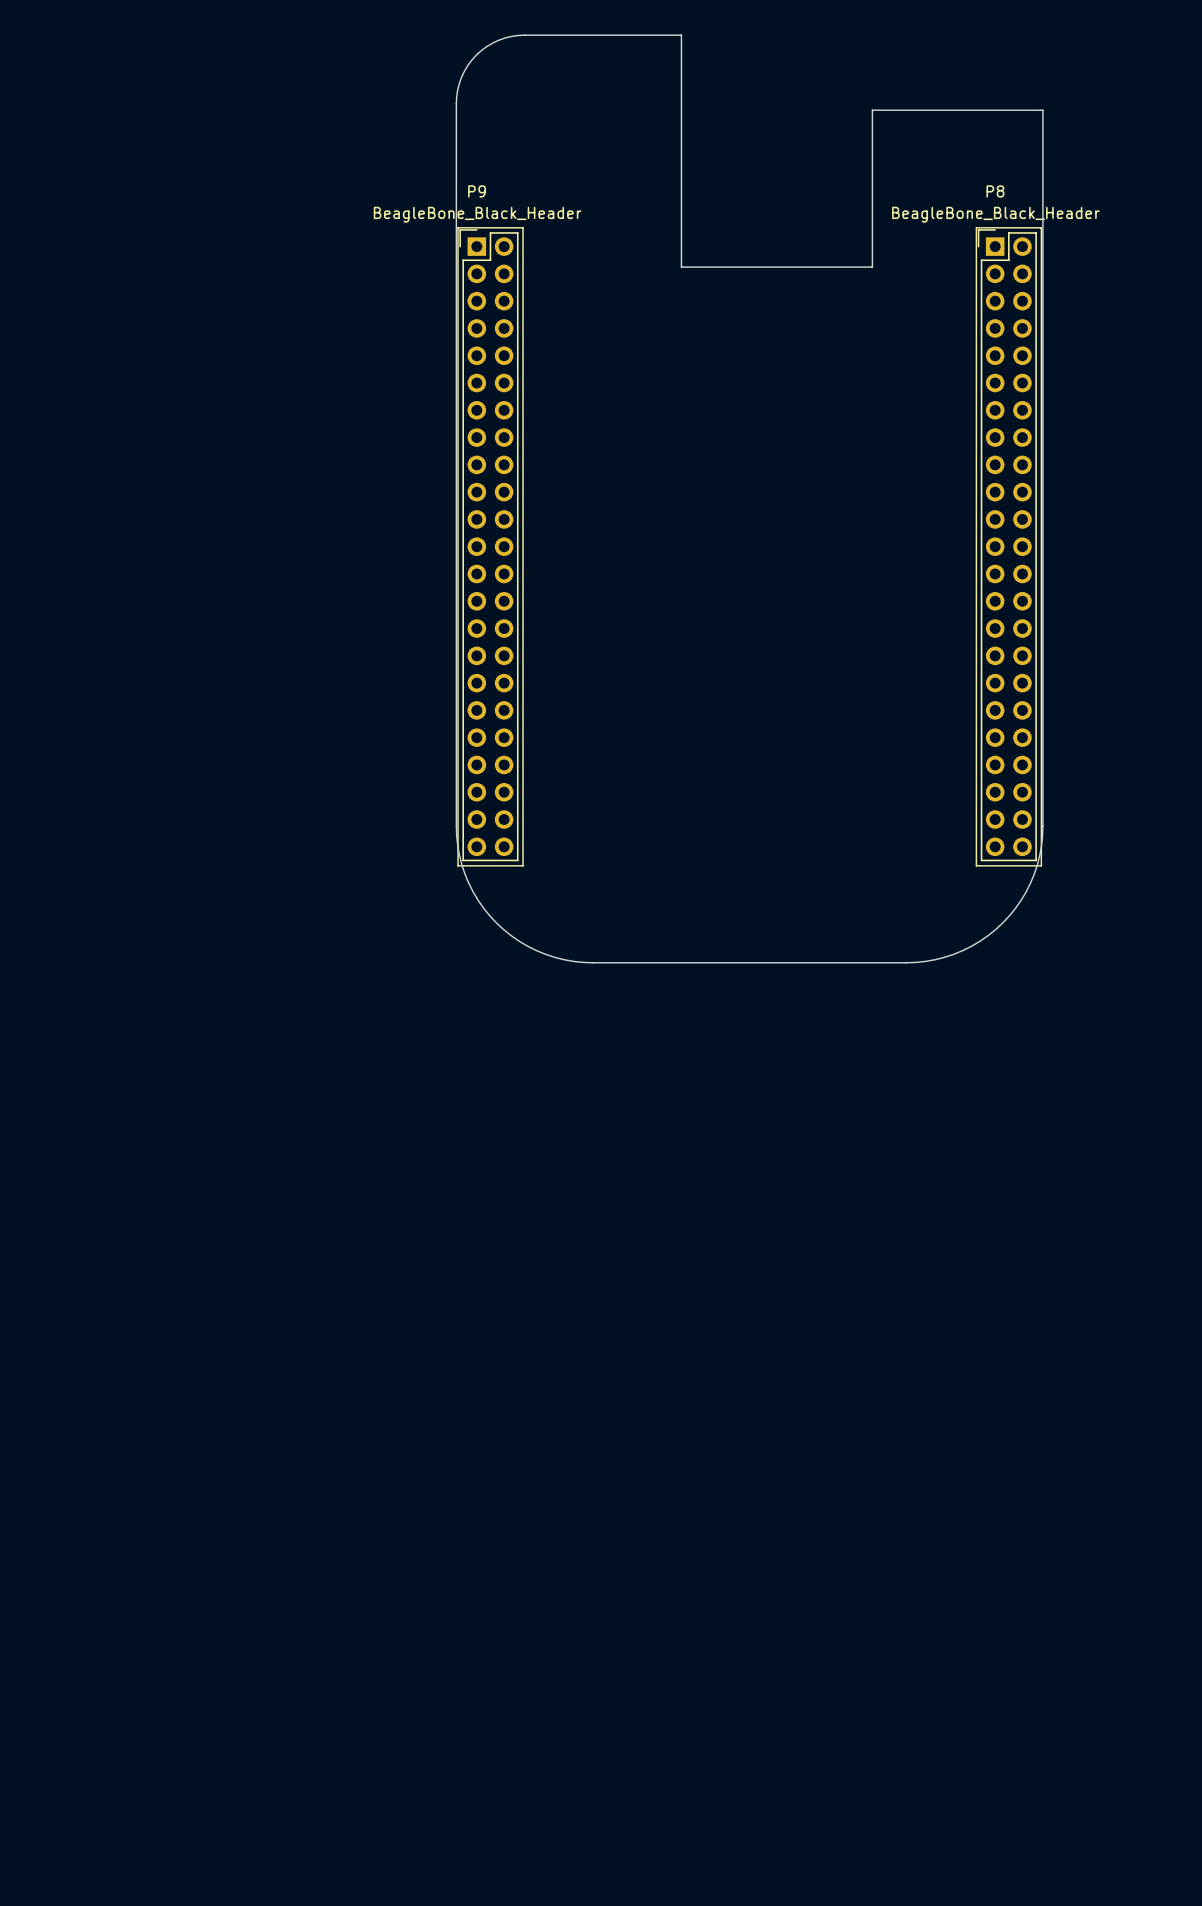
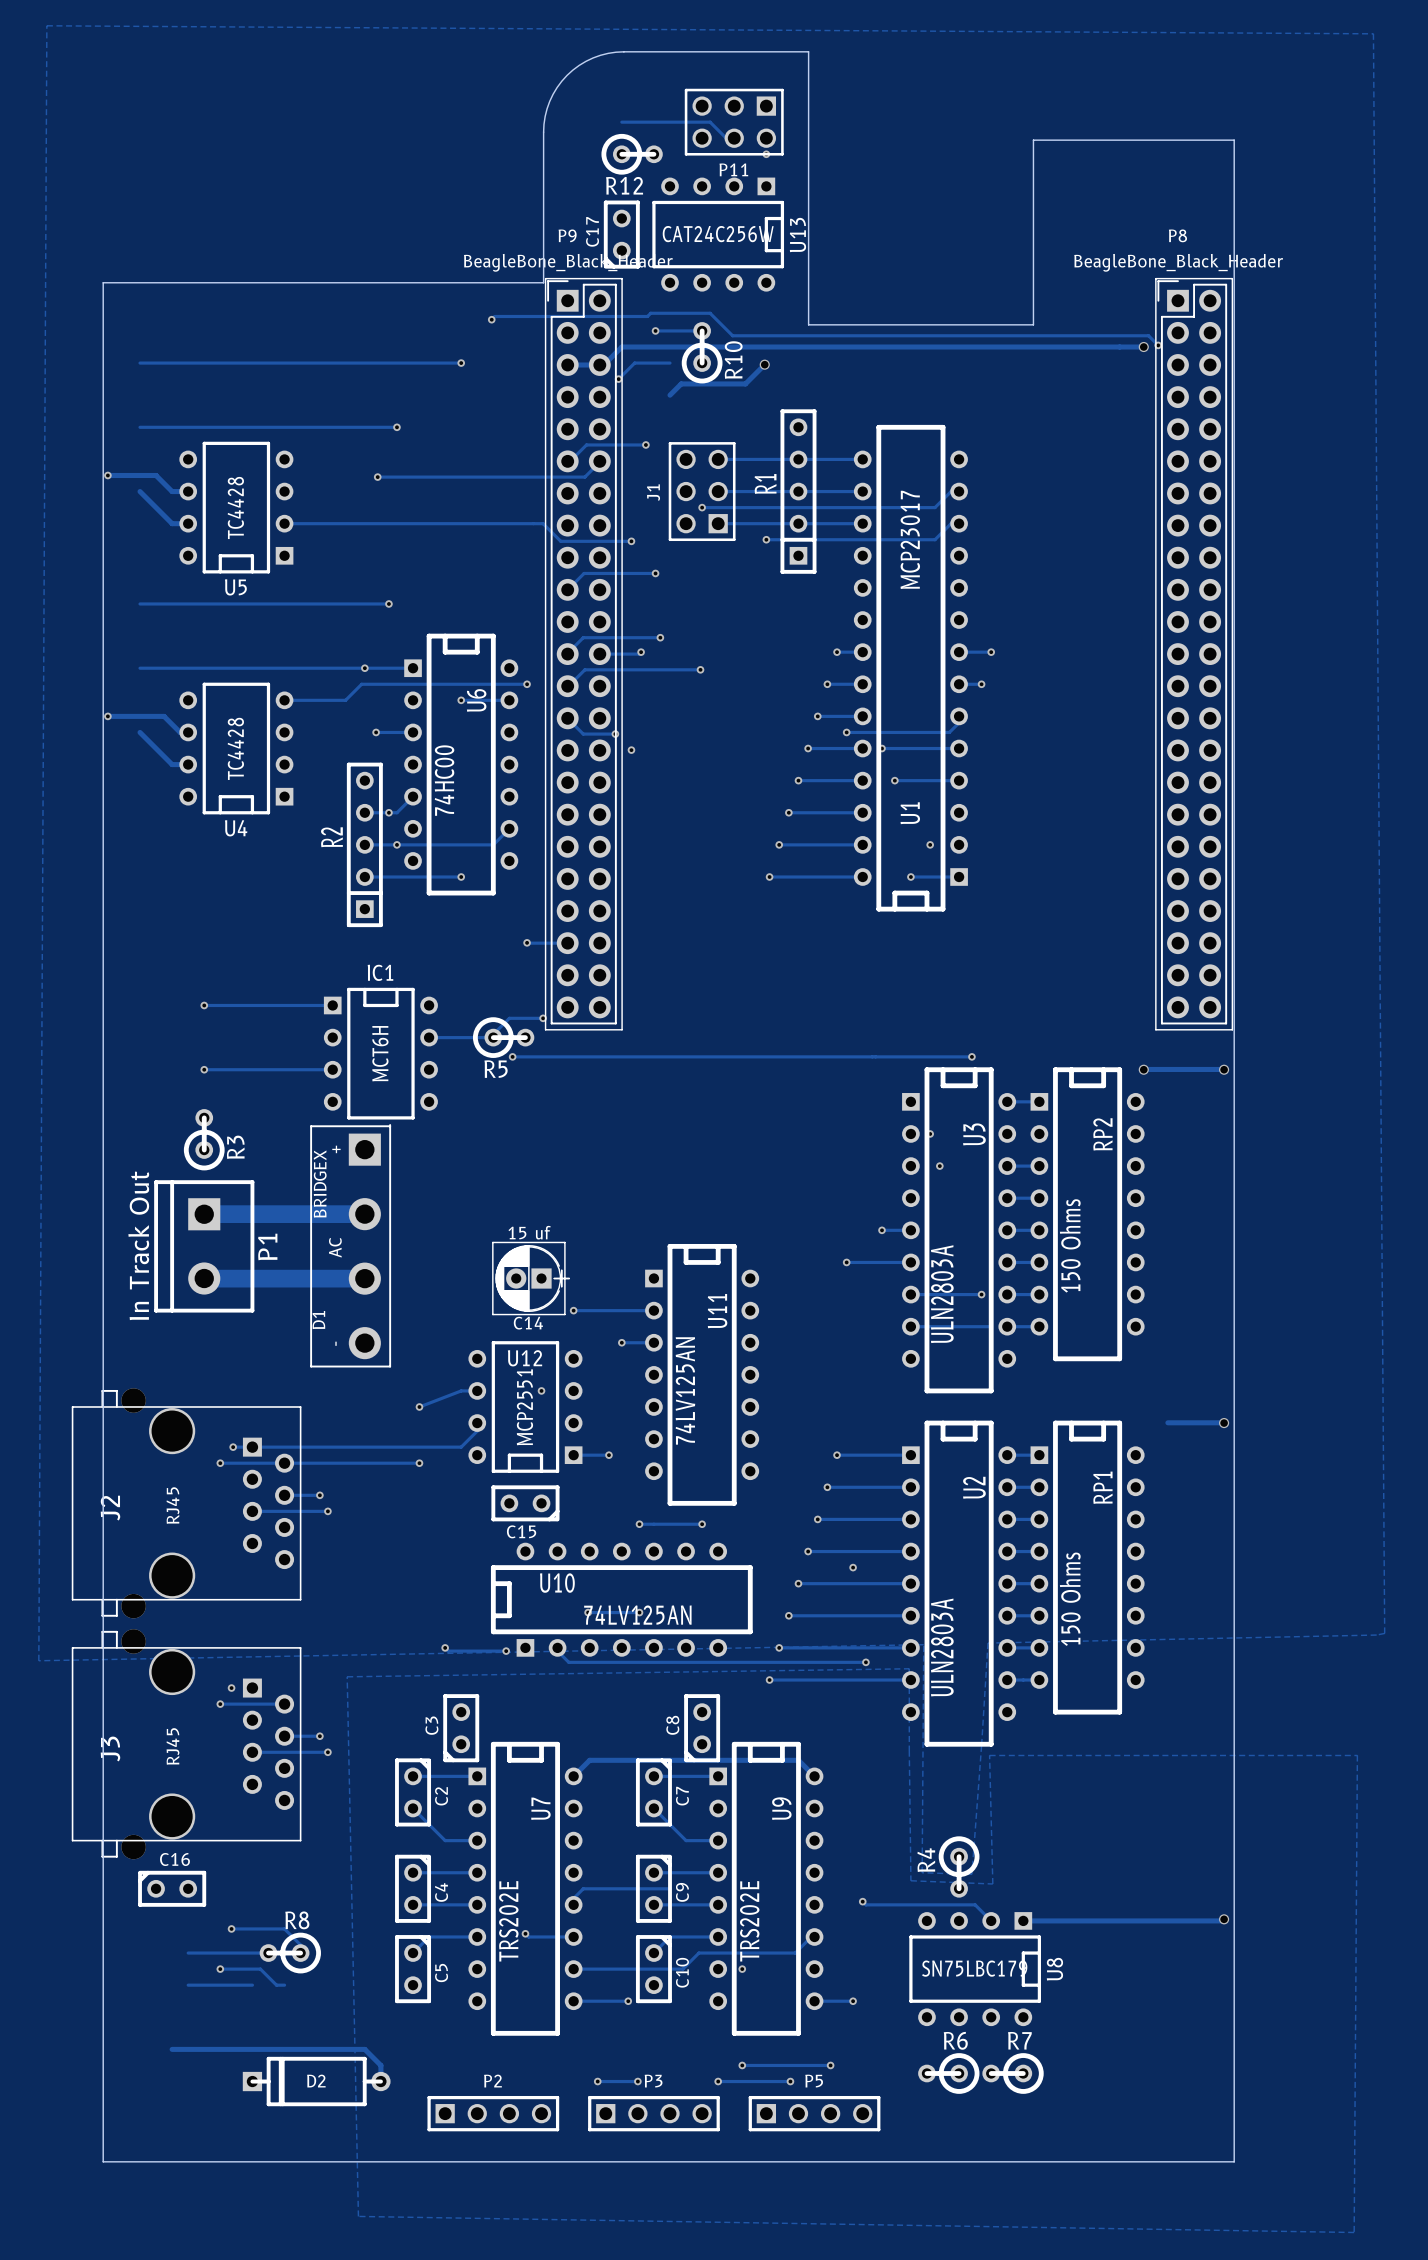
zone outline: none -> (46, 25) (38, 1660) (923, 1644) (922, 1872) (971, 1874) (988, 1643) (1384, 1633) (1373, 33) (46, 25)
track: none -> (621, 122) (710, 122) (726, 138) (734, 138)
P11: none -> (734, 122)
R12: none -> (632, 154)
via: none -> (766, 154)
C17: none -> (621, 234)
U13: none -> CAT24C256W (718, 234)
board edge: (456, 231) (456, 836) (459, 855) (468, 883) (478, 900) (496, 922) (519, 941) (536, 950) (554, 957) (583, 962) (925, 961) (954, 954) (971, 946) (995, 929) (1009, 915) (1026, 891) (1034, 874) (1041, 845) (1042, 826) -> (543, 282) (103, 282) (103, 2161) (1234, 2161) (1234, 983)
track: none -> (491, 319) (494, 316) (647, 316) (650, 313) (710, 313) (732, 335) (1148, 335) (1158, 345)
via: none -> (491, 319)
track: none -> (655, 330) (702, 330)
via: none -> (655, 330)
via: none -> (1158, 345)
track: none -> (1143, 347) (621, 347) (603, 364) (567, 364)
via: none -> (1143, 347)
R10: none -> (702, 352)
track: none -> (140, 363) (461, 363)
via: none -> (461, 363)
track: none -> (670, 363) (634, 363) (618, 379)
track: none -> (764, 364) (745, 383) (681, 383) (670, 395)
via: none -> (764, 364)
via: none -> (618, 379)
track: none -> (140, 427) (396, 427)
via: none -> (396, 427)
track: none -> (645, 444) (586, 444) (570, 461) (567, 461)
via: none -> (645, 444)
track: none -> (718, 459) (862, 459)
track: none -> (599, 461) (584, 477) (377, 477)
track: none -> (107, 475) (156, 475) (172, 491) (188, 491)
via: none -> (107, 475)
via: none -> (377, 477)
track: none -> (140, 491) (172, 523) (188, 523)
J1: none -> (702, 491)
track: none -> (718, 491) (862, 491)
R1: none -> (798, 491)
track: none -> (959, 491) (951, 491) (935, 507) (702, 507)
U5: none -> TC4428 (236, 507)
via: none -> (702, 507)
track: none -> (284, 523) (543, 523) (560, 541) (631, 541)
track: none -> (718, 523) (862, 523)
track: none -> (959, 523) (951, 523) (935, 539) (766, 539)
via: none -> (766, 539)
via: none -> (631, 541)
track: none -> (655, 573) (584, 573) (567, 589)
via: none -> (655, 573)
track: none -> (140, 603) (388, 603)
via: none -> (388, 603)
track: none -> (660, 637) (583, 637) (567, 654)
via: none -> (660, 637)
track: none -> (641, 652) (639, 654) (599, 654)
via: none -> (641, 652)
track: none -> (837, 652) (862, 652)
via: none -> (837, 652)
track: none -> (959, 652) (991, 652)
via: none -> (991, 652)
track: none -> (140, 668) (413, 668)
via: none -> (364, 668)
U1: none -> MCP23017 (910, 668)
track: none -> (700, 669) (584, 669) (567, 686)
via: none -> (700, 669)
track: none -> (527, 684) (361, 684) (345, 700) (284, 700)
via: none -> (527, 684)
track: none -> (827, 684) (862, 684)
via: none -> (827, 684)
track: none -> (959, 684) (981, 684)
via: none -> (981, 684)
track: none -> (461, 700) (509, 700)
via: none -> (461, 700)
track: none -> (107, 716) (164, 716) (180, 732) (188, 732)
via: none -> (107, 716)
track: none -> (817, 716) (862, 716)
via: none -> (817, 716)
track: none -> (959, 716) (959, 722) (949, 732) (846, 732)
track: none -> (567, 718) (583, 734) (615, 734)
track: none -> (140, 732) (172, 764) (188, 764)
track: none -> (376, 732) (413, 732)
via: none -> (376, 732)
via: none -> (846, 732)
via: none -> (615, 734)
U4: none -> TC4428 (236, 748)
track: none -> (808, 748) (862, 748)
via: none -> (808, 748)
track: none -> (882, 748) (959, 748)
via: none -> (882, 748)
via: none -> (631, 750)
U6: none -> 74HC00 (461, 764)
track: none -> (798, 780) (862, 780)
via: none -> (798, 780)
track: none -> (894, 780) (959, 780)
via: none -> (894, 780)
track: none -> (413, 796) (396, 812) (364, 812)
via: none -> (388, 812)
track: none -> (788, 812) (862, 812)
via: none -> (788, 812)
track: none -> (509, 828) (493, 844) (364, 844)
R2: none -> (364, 844)
via: none -> (396, 844)
track: none -> (779, 844) (862, 844)
via: none -> (779, 844)
via: none -> (930, 844)
track: none -> (364, 877) (461, 877)
via: none -> (461, 877)
track: none -> (769, 877) (862, 877)
via: none -> (769, 877)
track: none -> (910, 877) (959, 877)
via: none -> (910, 877)
track: none -> (527, 942) (567, 943)
via: none -> (527, 942)
track: none -> (204, 1005) (332, 1005)
via: none -> (204, 1005)
track: none -> (543, 1018) (509, 1018) (493, 1034) (493, 1037) (429, 1037)
via: none -> (543, 1018)
R5: none -> (503, 1037)
IC1: none -> MCT6H (380, 1053)
track: none -> (512, 1056) (971, 1056)
via: none -> (512, 1056)
via: none -> (971, 1056)
track: none -> (204, 1069) (332, 1069)
via: none -> (204, 1069)
track: none -> (1143, 1069) (1224, 1069)
via: none -> (1143, 1069)
via: none -> (1224, 1069)
track: none -> (1007, 1101) (1039, 1101)
via: none -> (930, 1133)
R3: none -> (204, 1139)
via: none -> (939, 1166)
track: none -> (1007, 1166) (1039, 1166)
track: none -> (1007, 1198) (1039, 1198)
track: none -> (204, 1214) (364, 1214)
RP2: none -> 150 Ohms (1087, 1214)
track: none -> (882, 1230) (910, 1230)
via: none -> (882, 1230)
U3: none -> ULN2803A (959, 1230)
track: none -> (1007, 1230) (1039, 1230)
P1: none -> In Track Out (204, 1246)
D1: none -> BRIDGEX (350, 1245)
track: none -> (846, 1262) (910, 1262)
via: none -> (846, 1262)
track: none -> (1007, 1262) (1039, 1262)
track: none -> (204, 1278) (364, 1278)
C14: none -> 15 uf (531, 1278)
track: none -> (910, 1294) (981, 1294)
via: none -> (981, 1294)
track: none -> (1007, 1294) (1039, 1294)
track: none -> (573, 1310) (653, 1310)
via: none -> (573, 1310)
track: none -> (910, 1326) (991, 1326)
track: none -> (1007, 1326) (1039, 1326)
track: none -> (621, 1342) (653, 1342)
via: none -> (621, 1342)
U11: none -> 74LV125AN (702, 1374)
track: none -> (477, 1390) (461, 1390) (419, 1406)
via: none -> (541, 1390)
via: none -> (419, 1406)
U12: none -> MCP2551 (525, 1406)
track: none -> (477, 1423) (477, 1431) (461, 1447) (233, 1447)
track: none -> (1167, 1422) (1224, 1423)
via: none -> (1224, 1423)
via: none -> (233, 1447)
track: none -> (573, 1455) (608, 1455)
via: none -> (608, 1455)
track: none -> (837, 1455) (910, 1455)
via: none -> (837, 1455)
track: none -> (1007, 1455) (1039, 1455)
track: none -> (220, 1463) (419, 1463)
via: none -> (220, 1463)
via: none -> (419, 1463)
track: none -> (827, 1487) (910, 1487)
via: none -> (827, 1487)
track: none -> (1007, 1487) (1039, 1487)
track: none -> (284, 1495) (319, 1495)
via: none -> (319, 1495)
J2: none -> RJ45 (186, 1503)
C15: none -> (525, 1503)
track: none -> (252, 1511) (327, 1511)
via: none -> (327, 1511)
track: none -> (817, 1519) (910, 1519)
via: none -> (817, 1519)
track: none -> (1007, 1519) (1039, 1519)
track: none -> (639, 1524) (702, 1524)
via: none -> (639, 1524)
via: none -> (702, 1524)
track: none -> (808, 1551) (910, 1551)
via: none -> (808, 1551)
track: none -> (1007, 1551) (1039, 1551)
via: none -> (853, 1567)
RP1: none -> 150 Ohms (1087, 1567)
track: none -> (798, 1583) (910, 1583)
via: none -> (798, 1583)
U2: none -> ULN2803A (959, 1583)
track: none -> (1007, 1583) (1039, 1583)
U10: none -> 74LV125AN (621, 1599)
track: none -> (588, 1612) (639, 1612)
via: none -> (588, 1612)
via: none -> (639, 1612)
track: none -> (788, 1615) (910, 1615)
via: none -> (788, 1615)
track: none -> (1007, 1615) (1039, 1615)
track: none -> (445, 1647) (448, 1651) (506, 1651)
via: none -> (445, 1647)
track: none -> (557, 1647) (557, 1651) (568, 1662) (865, 1662)
track: none -> (779, 1647) (910, 1647)
via: none -> (779, 1647)
track: none -> (1007, 1647) (1039, 1647)
via: none -> (506, 1651)
via: none -> (865, 1662)
zone outline: none -> (909, 1668) (347, 1676) (358, 2216) (1354, 2232) (1357, 1755) (989, 1755) (992, 1883) (910, 1880) (909, 1668)
track: none -> (769, 1680) (910, 1680)
via: none -> (769, 1680)
track: none -> (1007, 1680) (1039, 1680)
via: none -> (231, 1688)
track: none -> (220, 1704) (284, 1704)
via: none -> (220, 1704)
C3: none -> (461, 1728)
C8: none -> (702, 1728)
track: none -> (284, 1736) (319, 1736)
via: none -> (319, 1736)
J3: none -> RJ45 (186, 1744)
track: none -> (252, 1752) (327, 1752)
via: none -> (327, 1752)
track: none -> (413, 1776) (477, 1776)
track: none -> (573, 1776) (589, 1760) (798, 1760) (814, 1776)
track: none -> (653, 1776) (718, 1776)
C2: none -> (413, 1792)
C7: none -> (653, 1792)
track: none -> (413, 1808) (445, 1840) (477, 1840)
track: none -> (653, 1808) (686, 1840) (718, 1840)
R4: none -> (959, 1866)
track: none -> (413, 1872) (477, 1872)
track: none -> (653, 1872) (718, 1872)
C16: none -> (172, 1888)
C4: none -> (413, 1888)
U7: none -> TRS202E (525, 1888)
C9: none -> (653, 1888)
track: none -> (670, 1888) (583, 1888) (573, 1898) (573, 1904)
U9: none -> TRS202E (766, 1888)
track: none -> (862, 1901) (865, 1904) (975, 1904) (991, 1920)
via: none -> (862, 1901)
track: none -> (413, 1904) (477, 1904)
track: none -> (653, 1904) (718, 1904)
track: none -> (1224, 1919) (1222, 1920) (1023, 1920)
via: none -> (1224, 1919)
track: none -> (231, 1928) (284, 1928) (300, 1945) (300, 1953)
via: none -> (231, 1928)
track: none -> (525, 1933) (528, 1936) (573, 1936)
via: none -> (525, 1933)
track: none -> (477, 1936) (429, 1936) (413, 1953)
track: none -> (718, 1936) (670, 1936) (653, 1953)
track: none -> (814, 1936) (811, 1936) (795, 1953) (698, 1953) (682, 1969) (573, 1969)
track: none -> (188, 1953) (268, 1953)
R8: none -> (290, 1953)
track: none -> (220, 1969) (260, 1969) (276, 1985) (284, 1985)
via: none -> (220, 1969)
C5: none -> (413, 1969)
C10: none -> (653, 1969)
via: none -> (742, 1969)
U8: none -> SN75LBC179 (975, 1969)
track: none -> (188, 1985) (252, 1985)
track: none -> (573, 2001) (628, 2001)
via: none -> (628, 2001)
track: none -> (814, 2001) (853, 2001)
via: none -> (853, 2001)
track: none -> (172, 2049) (364, 2049) (380, 2065) (380, 2081)
track: none -> (742, 2065) (830, 2065)
via: none -> (742, 2065)
via: none -> (830, 2065)
R6: none -> (948, 2073)
R7: none -> (1013, 2073)
D2: none -> (316, 2081)
track: none -> (597, 2081) (637, 2081)
via: none -> (597, 2081)
via: none -> (637, 2081)
track: none -> (718, 2081) (790, 2081)
via: none -> (718, 2081)
via: none -> (790, 2081)
P2: none -> (493, 2113)
P3: none -> (653, 2113)
P5: none -> (814, 2113)

